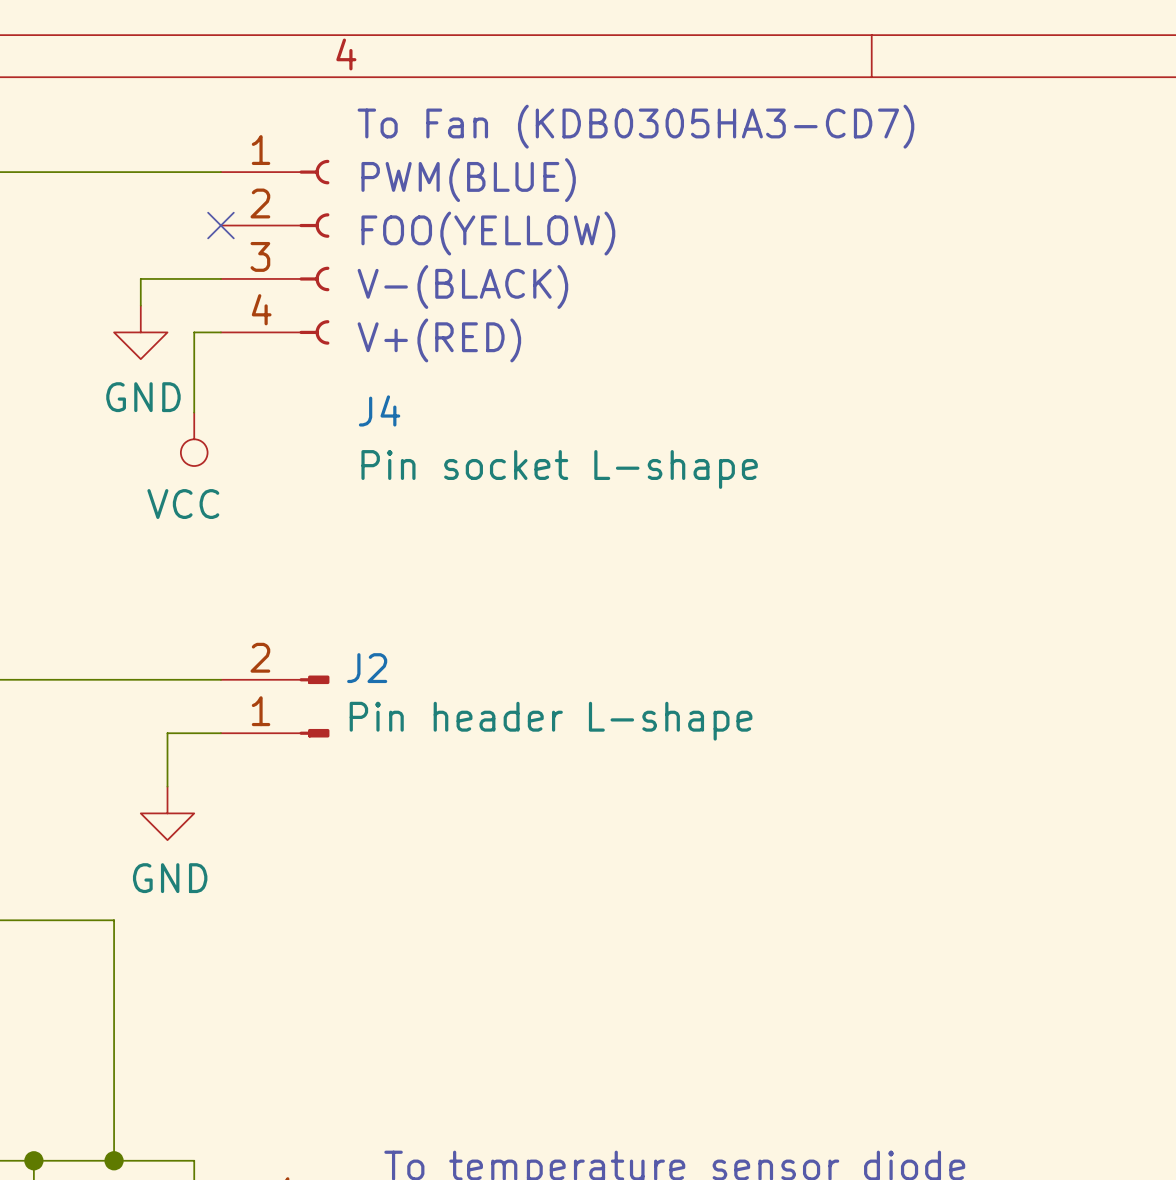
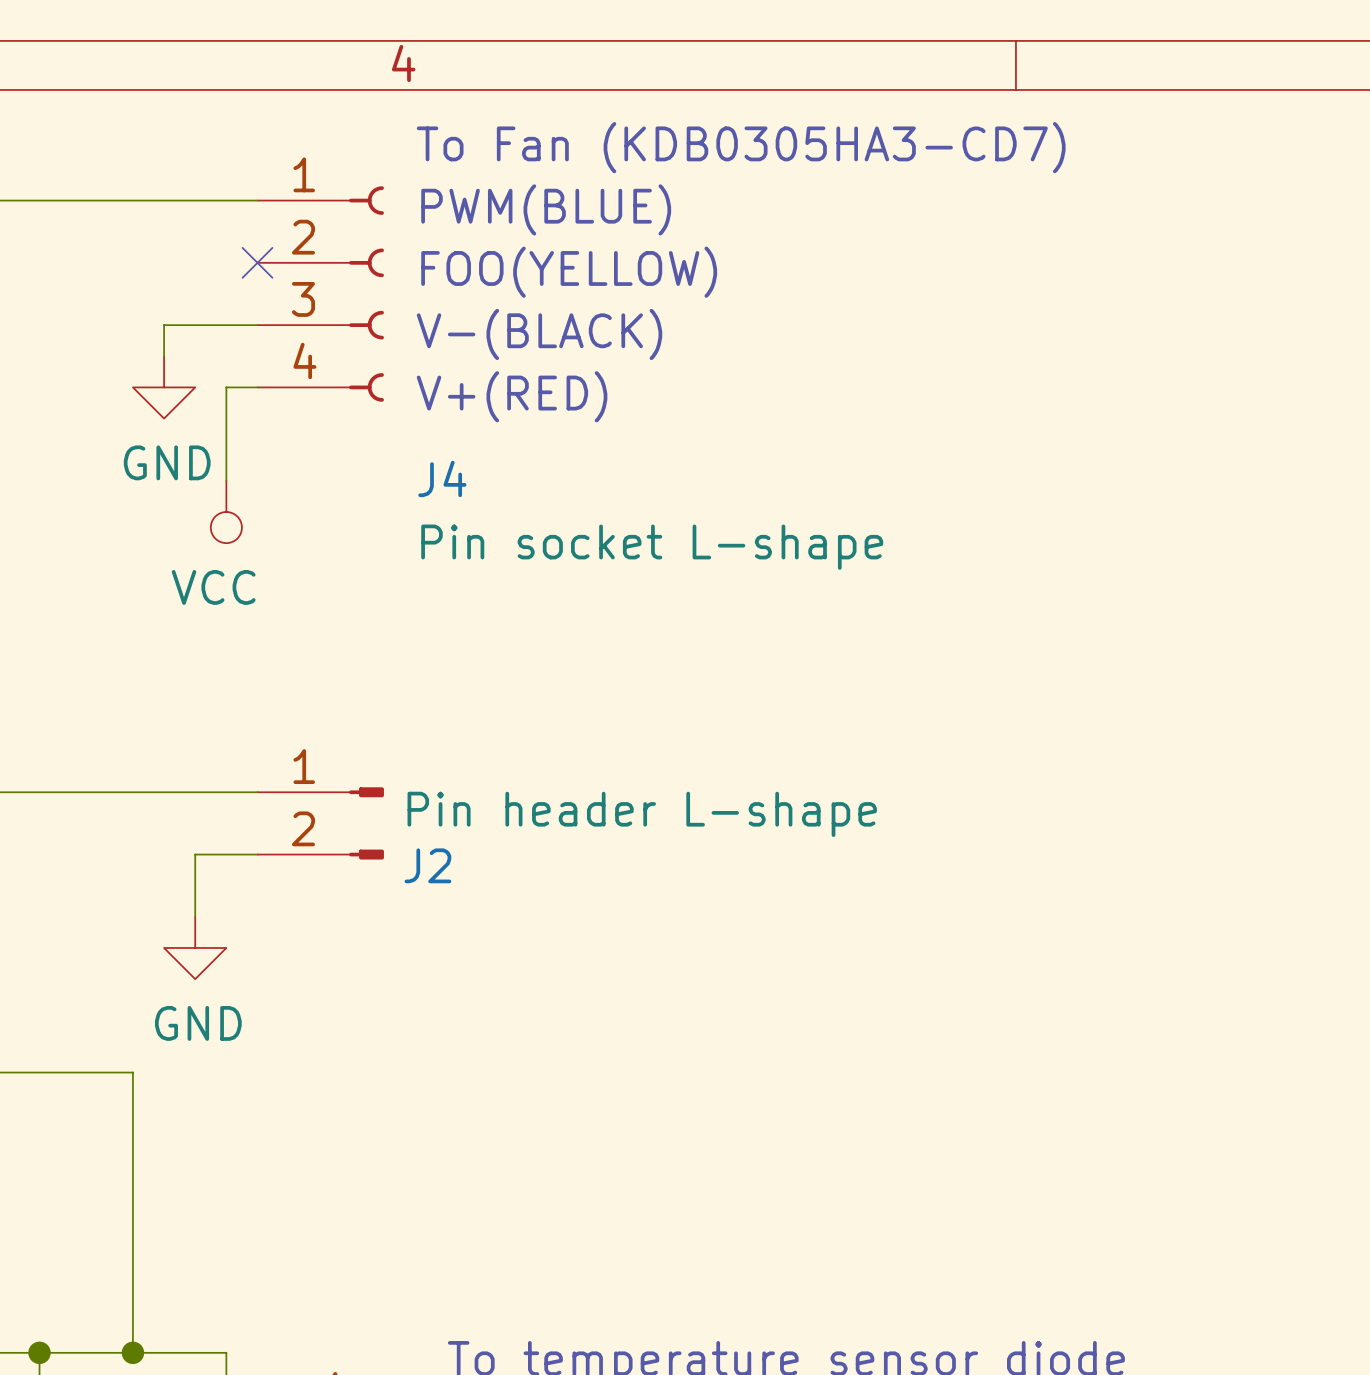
J2 flip: as is (314, 706) -> up-down (366, 823)

